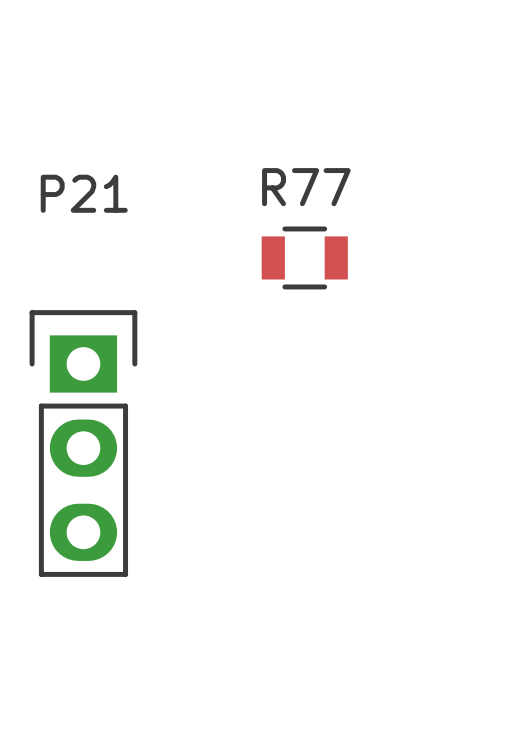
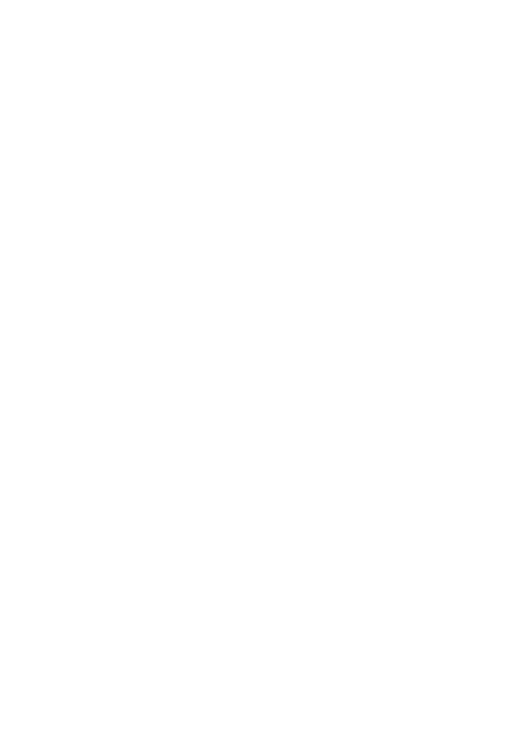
R77: (304, 257) -> none
P21: (83, 443) -> none

